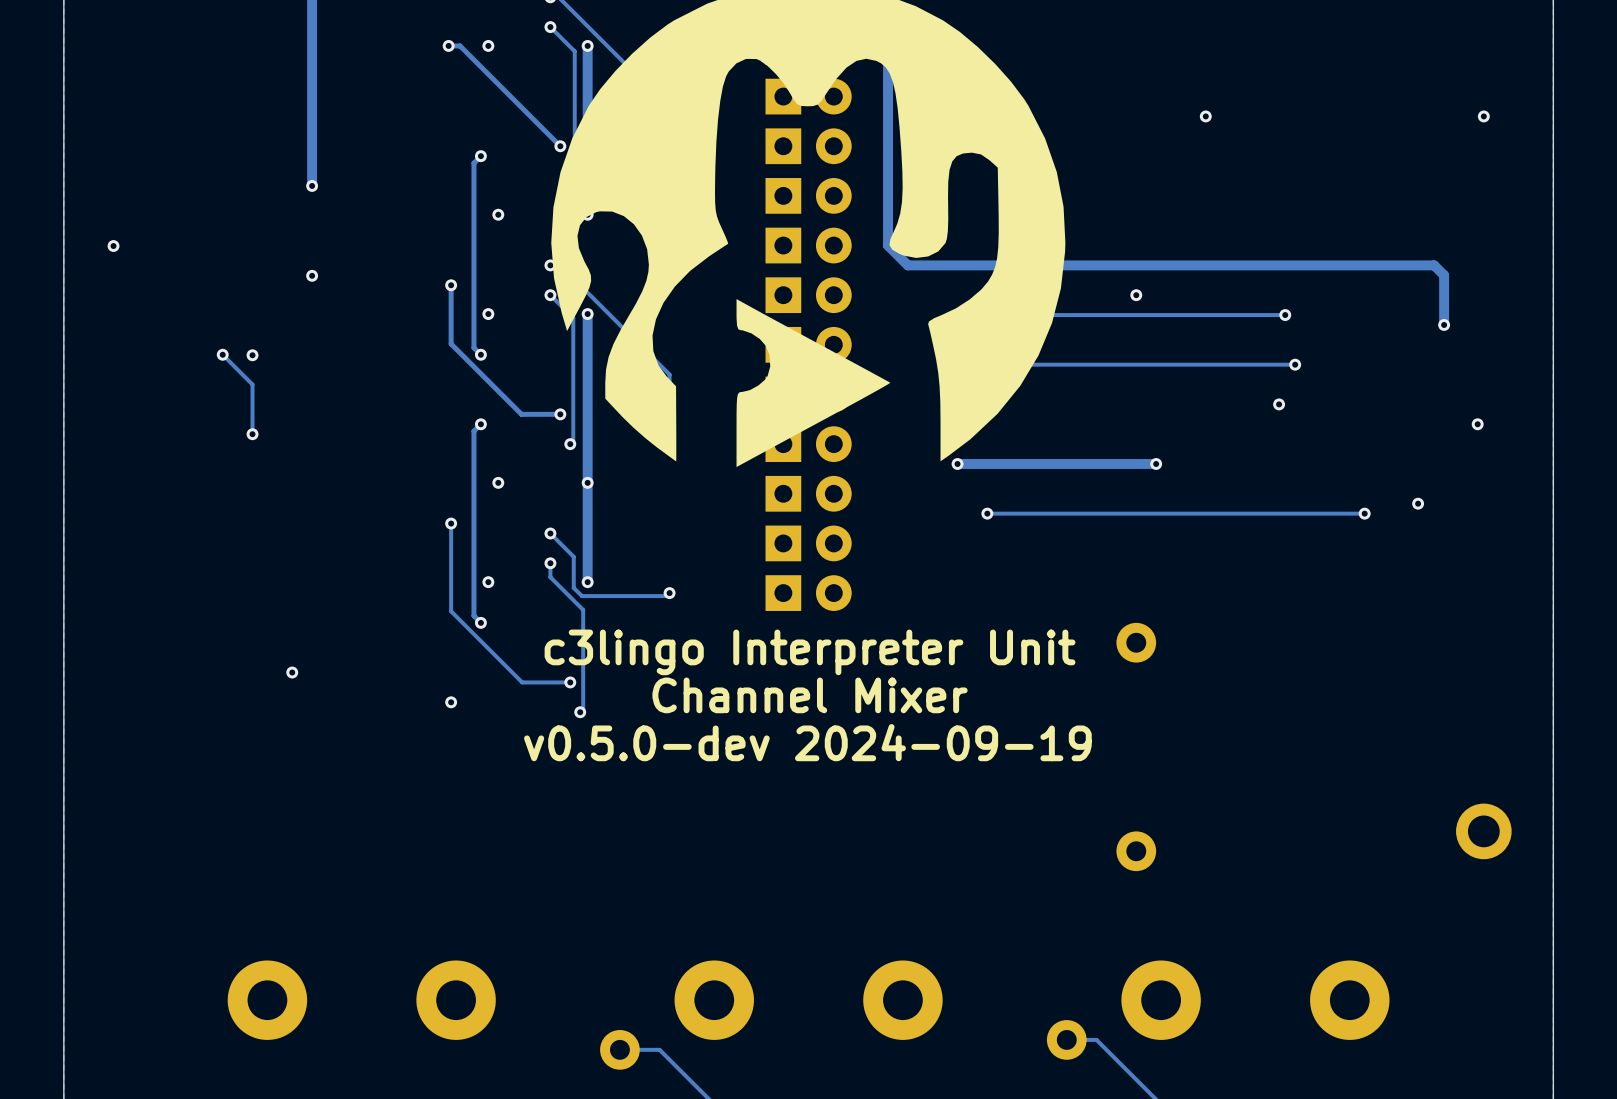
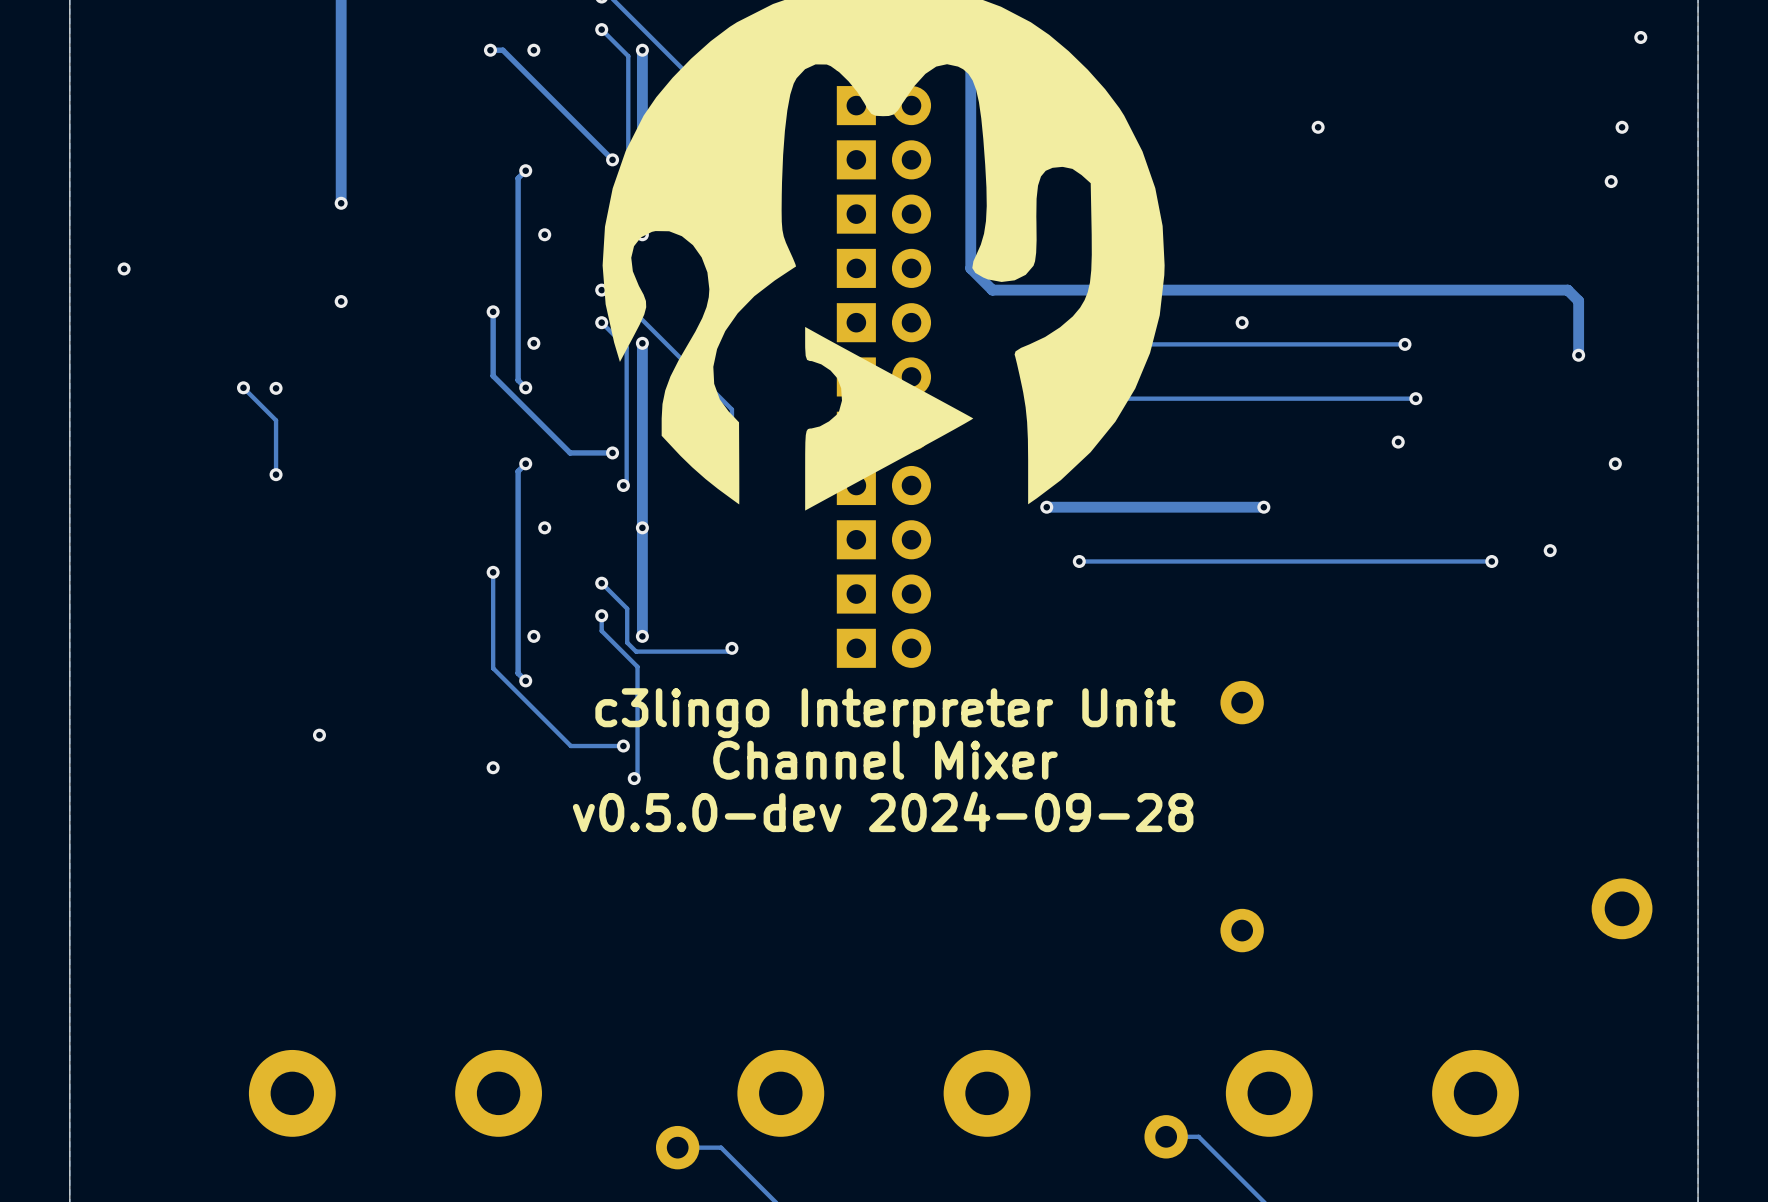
via: none -> (1640, 37)
via: none -> (1611, 181)
text: v0.5.0-dev 2024-09-19 (807, 742) -> v0.5.0-dev 2024-09-28 (883, 811)

